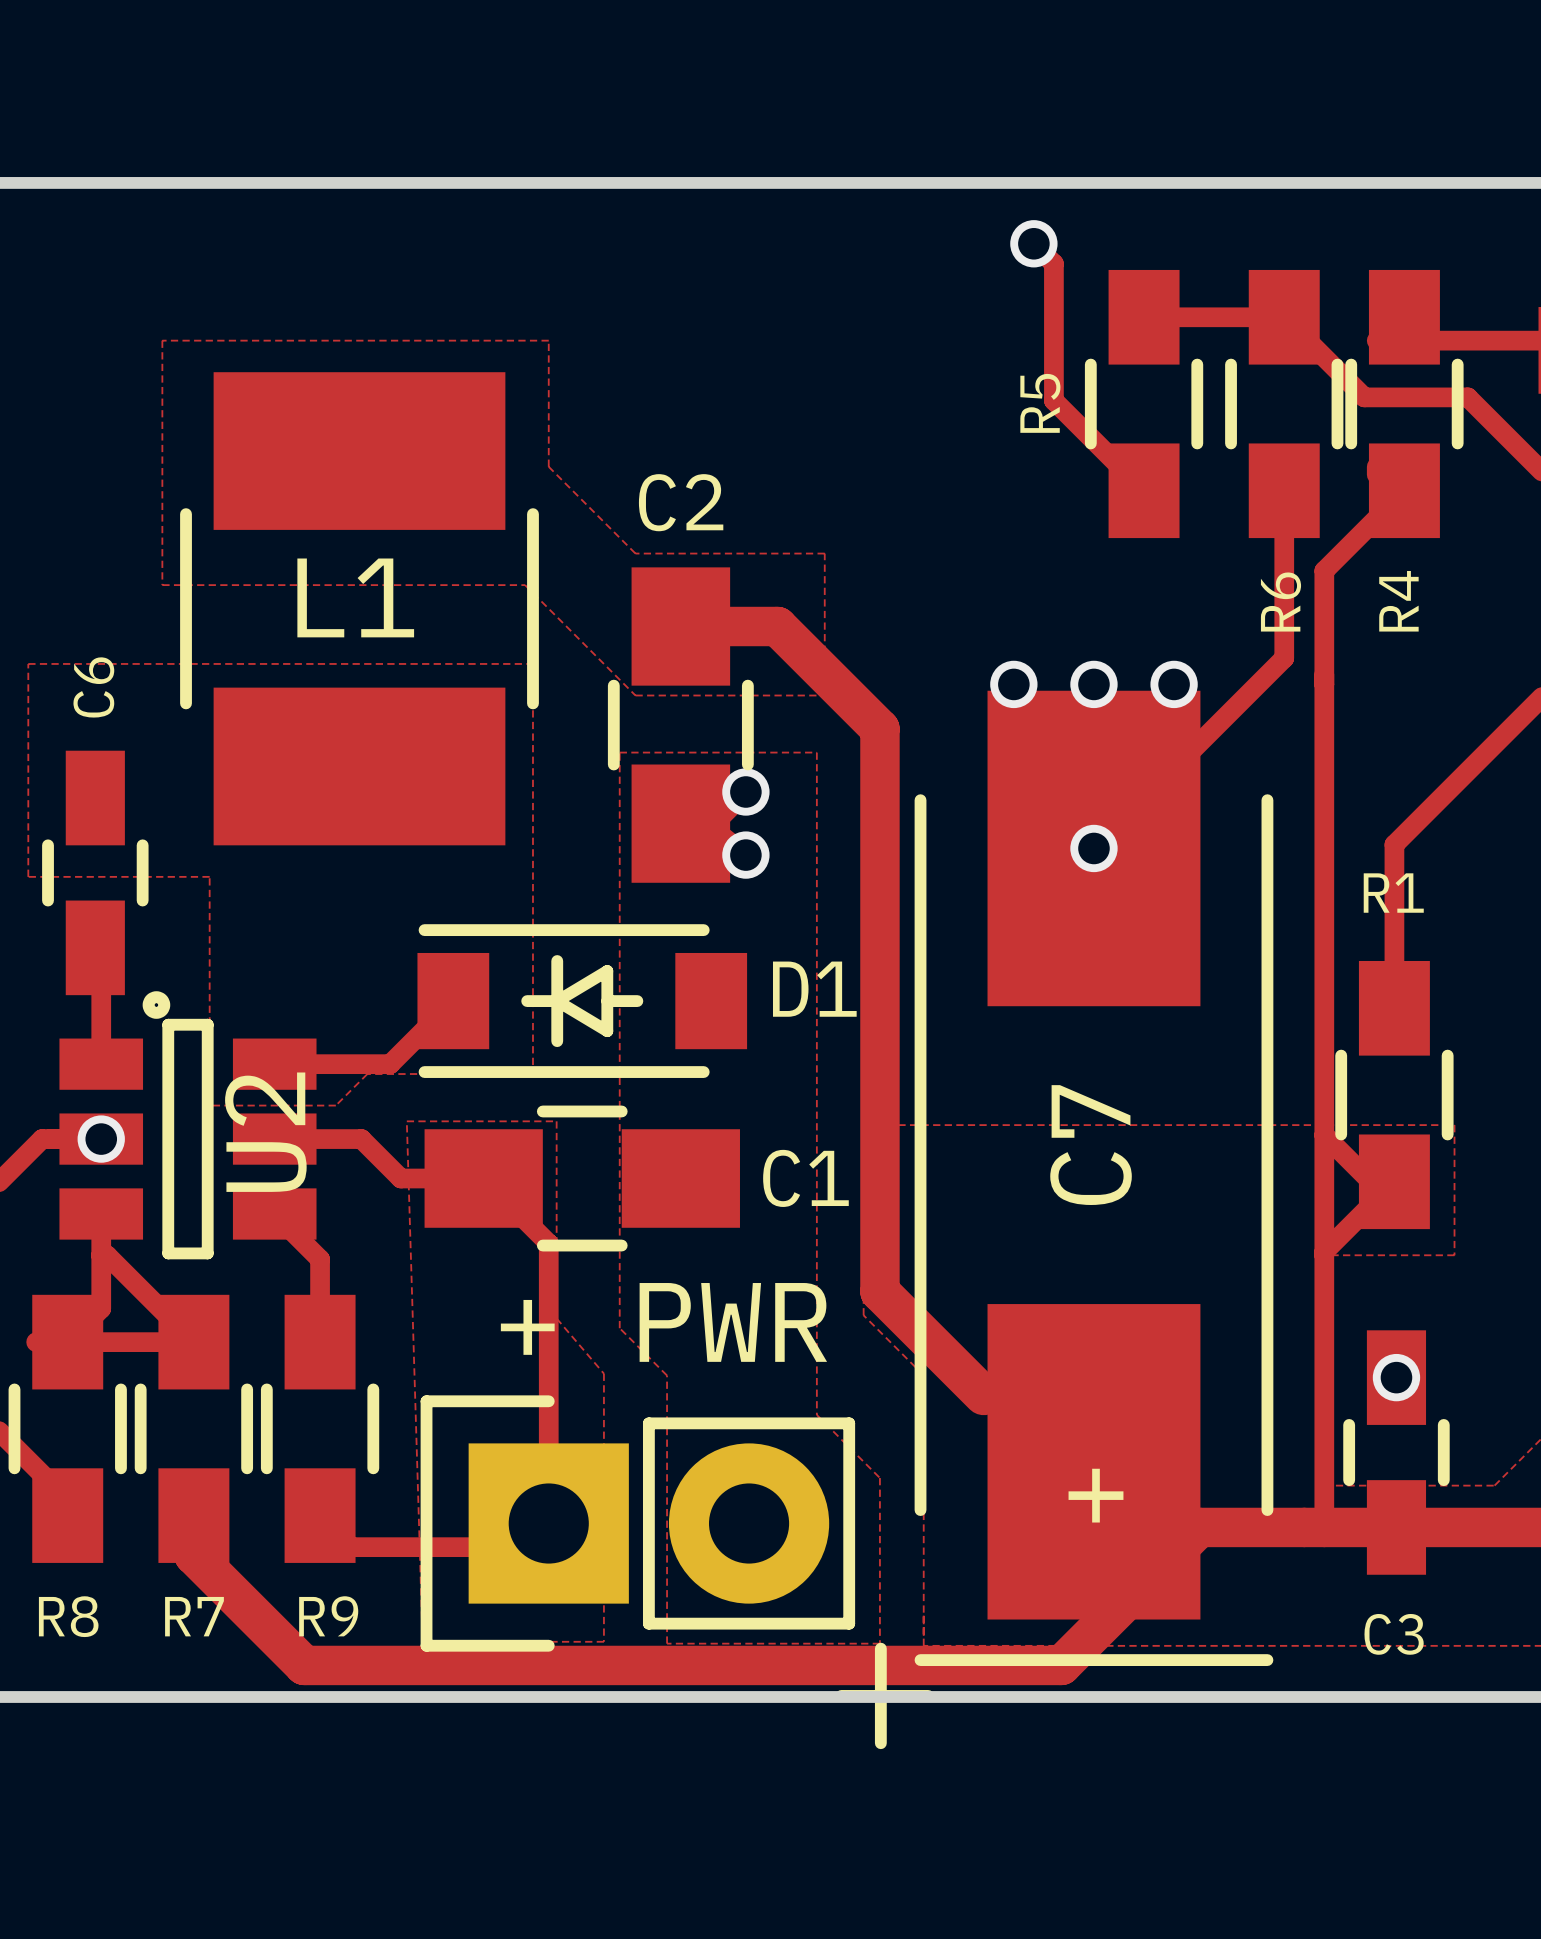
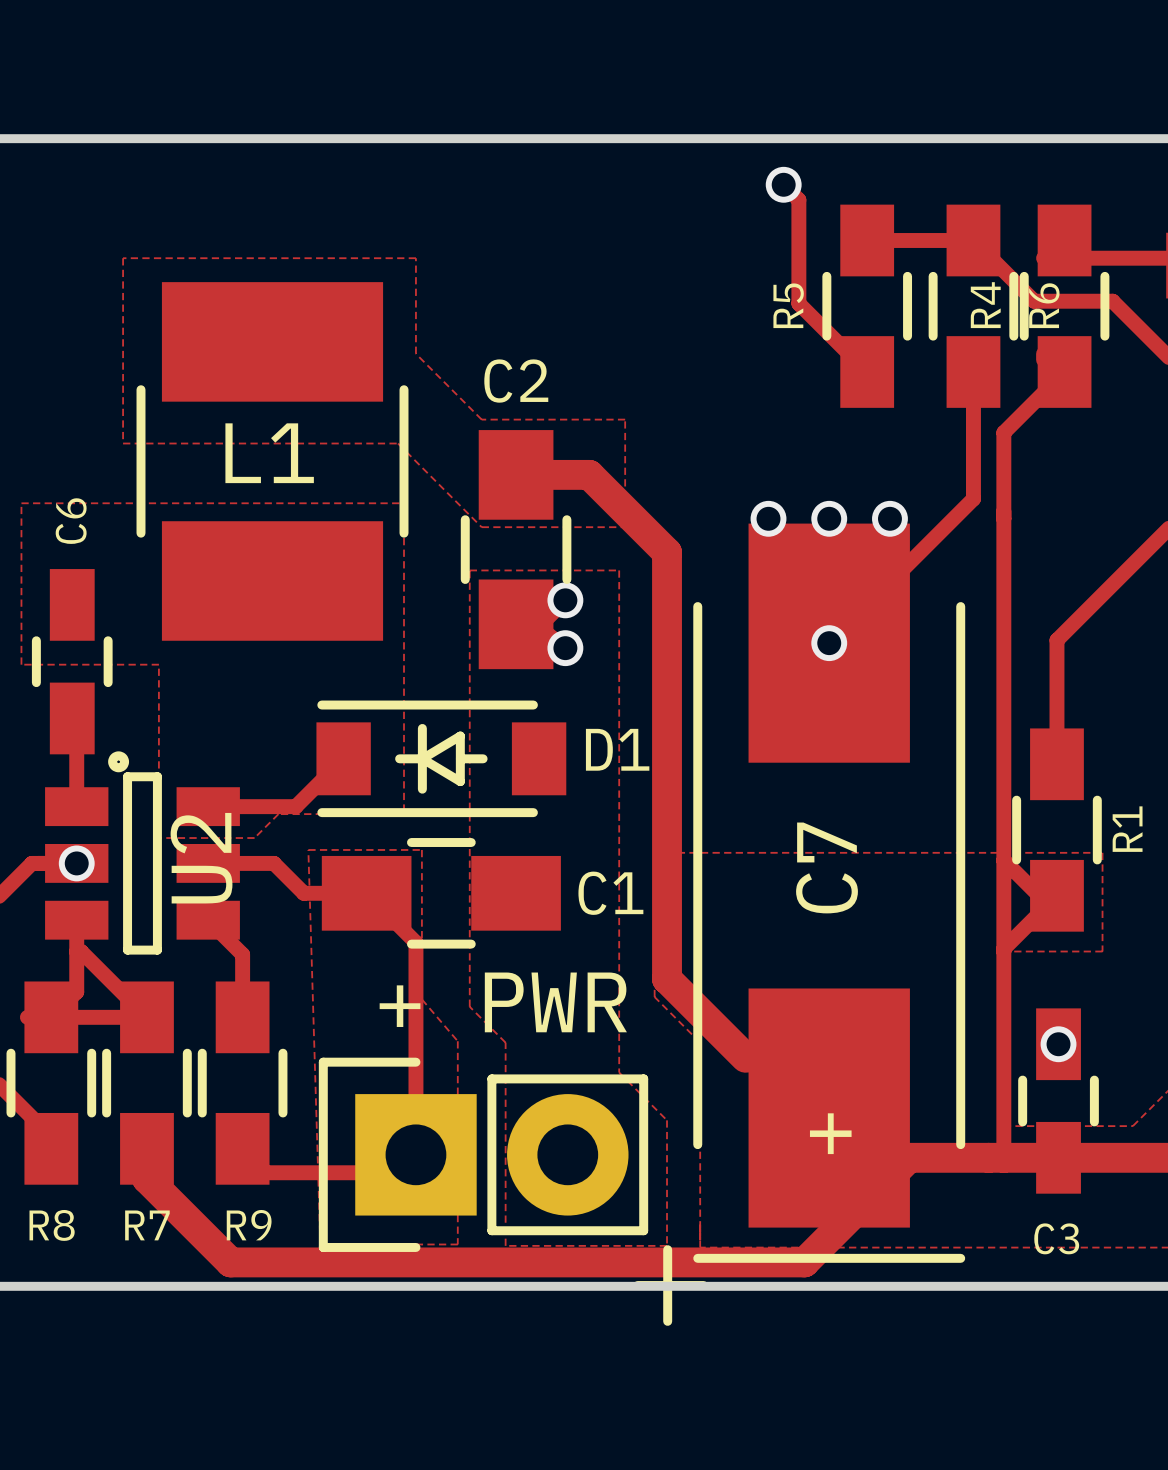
R4 name position: R4 (1398, 601) -> R4 (985, 305)
R6 name position: R6 (1280, 602) -> R6 (1044, 305)
R1 name rotation: 0° (1393, 893) -> 90° counterclockwise (1127, 829)
R1 name position: R1 (1393, 893) -> R1 (1127, 829)

